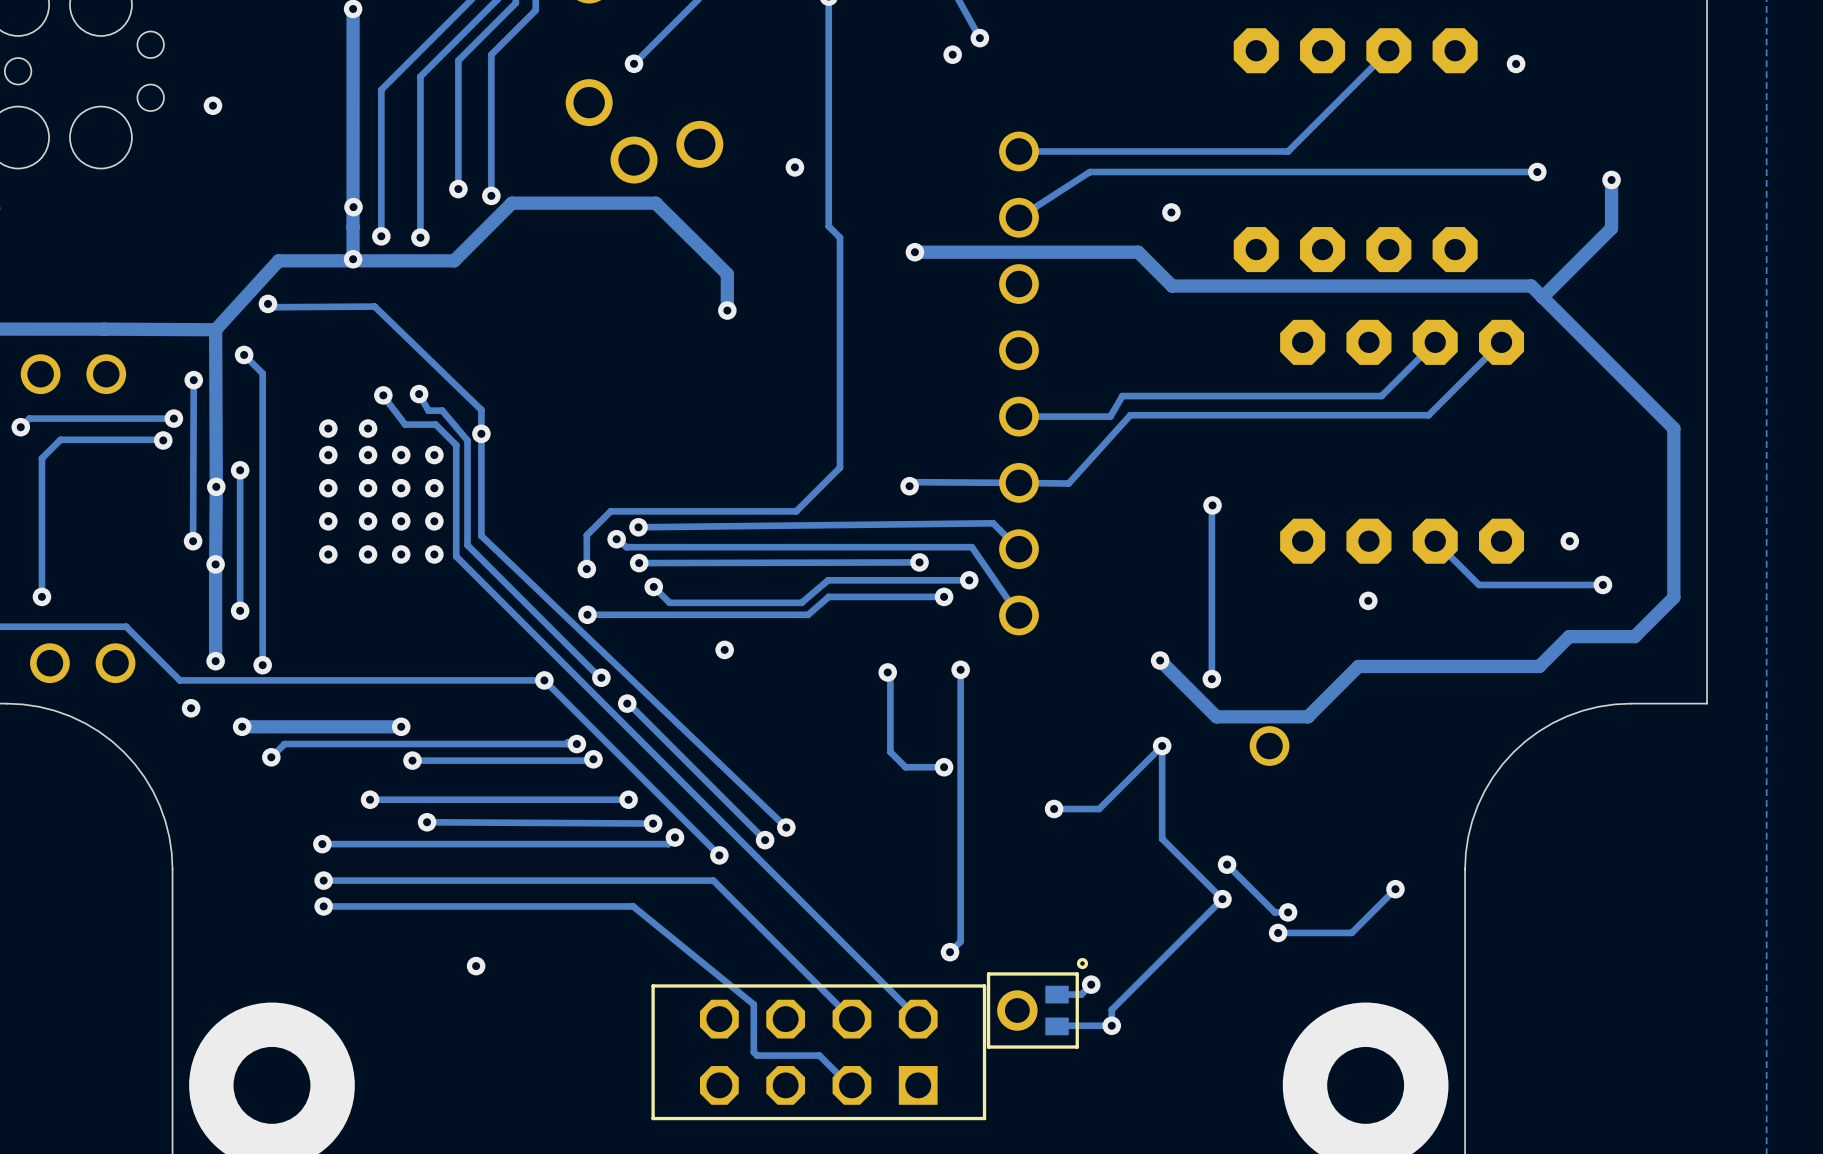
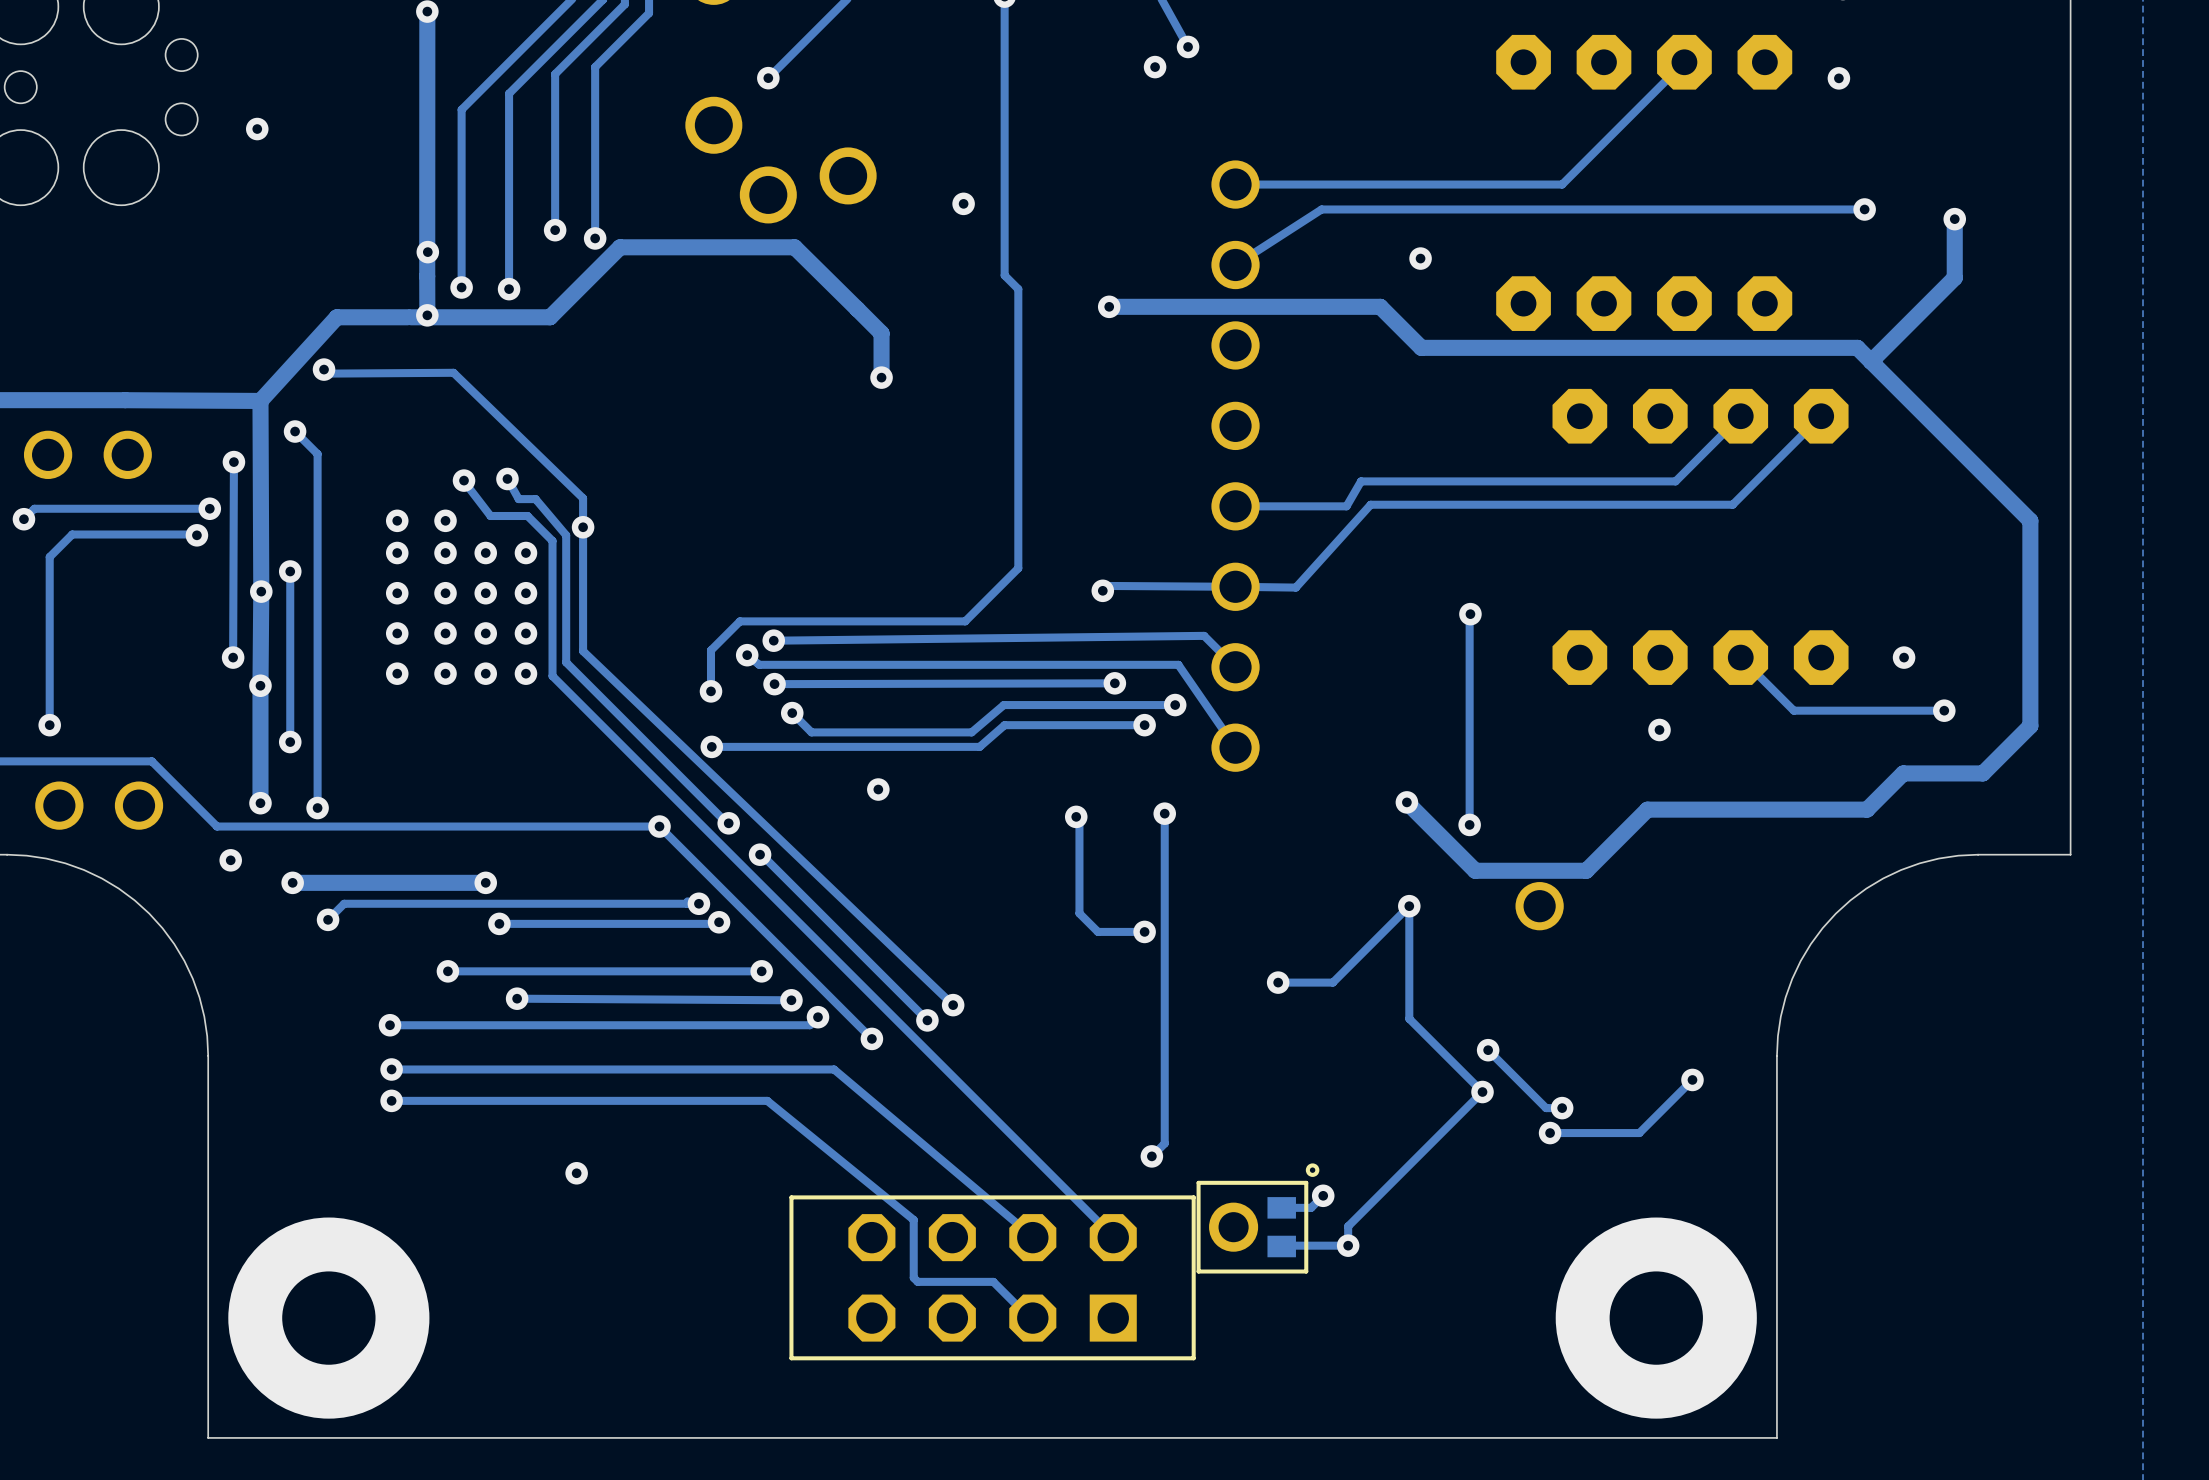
track: (688, 880) (713, 880) (851, 1019) -> (834, 1069) (1032, 1236)

